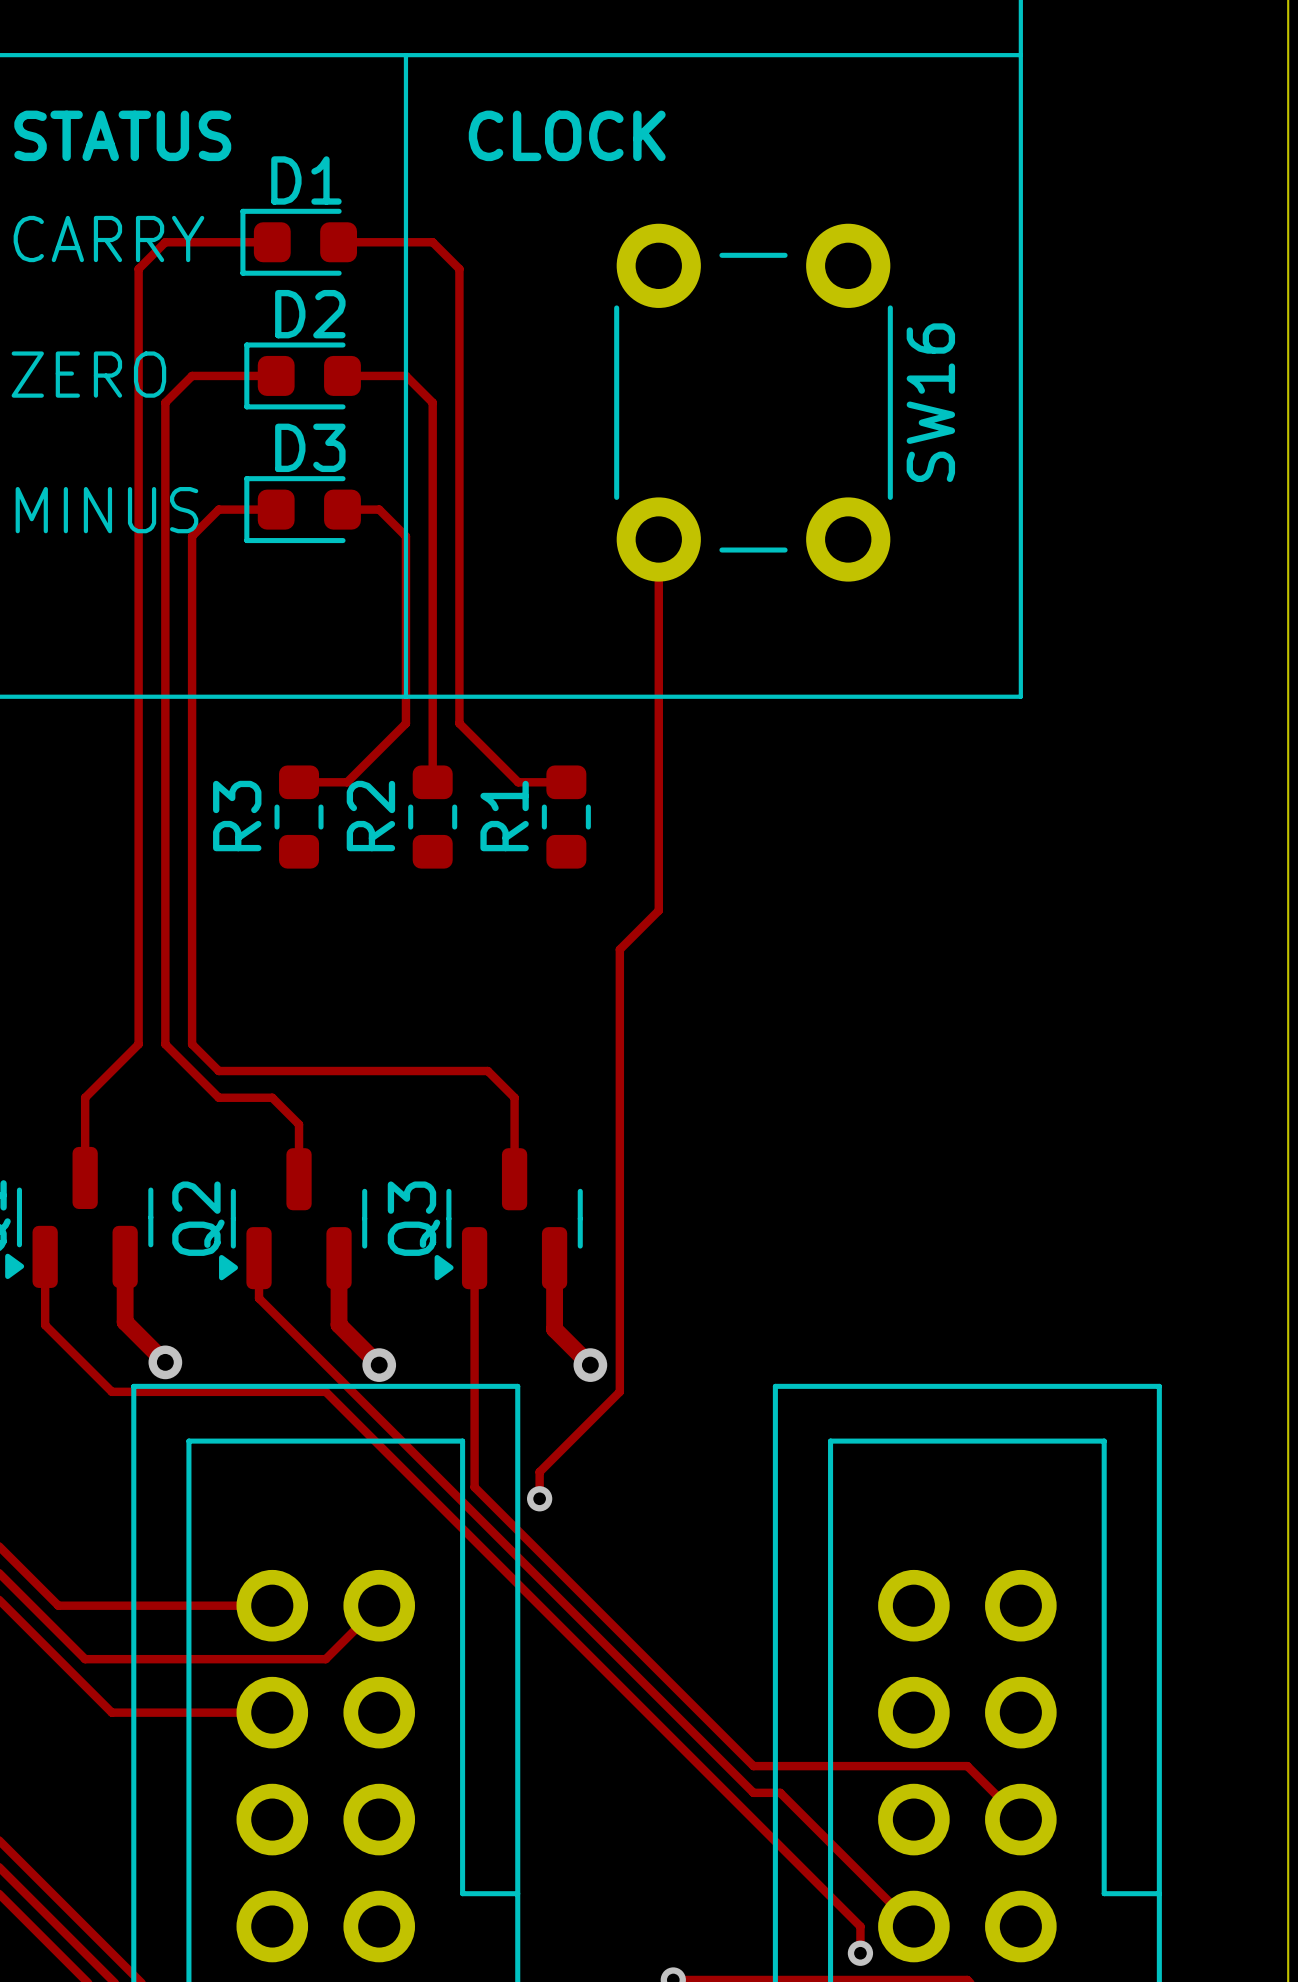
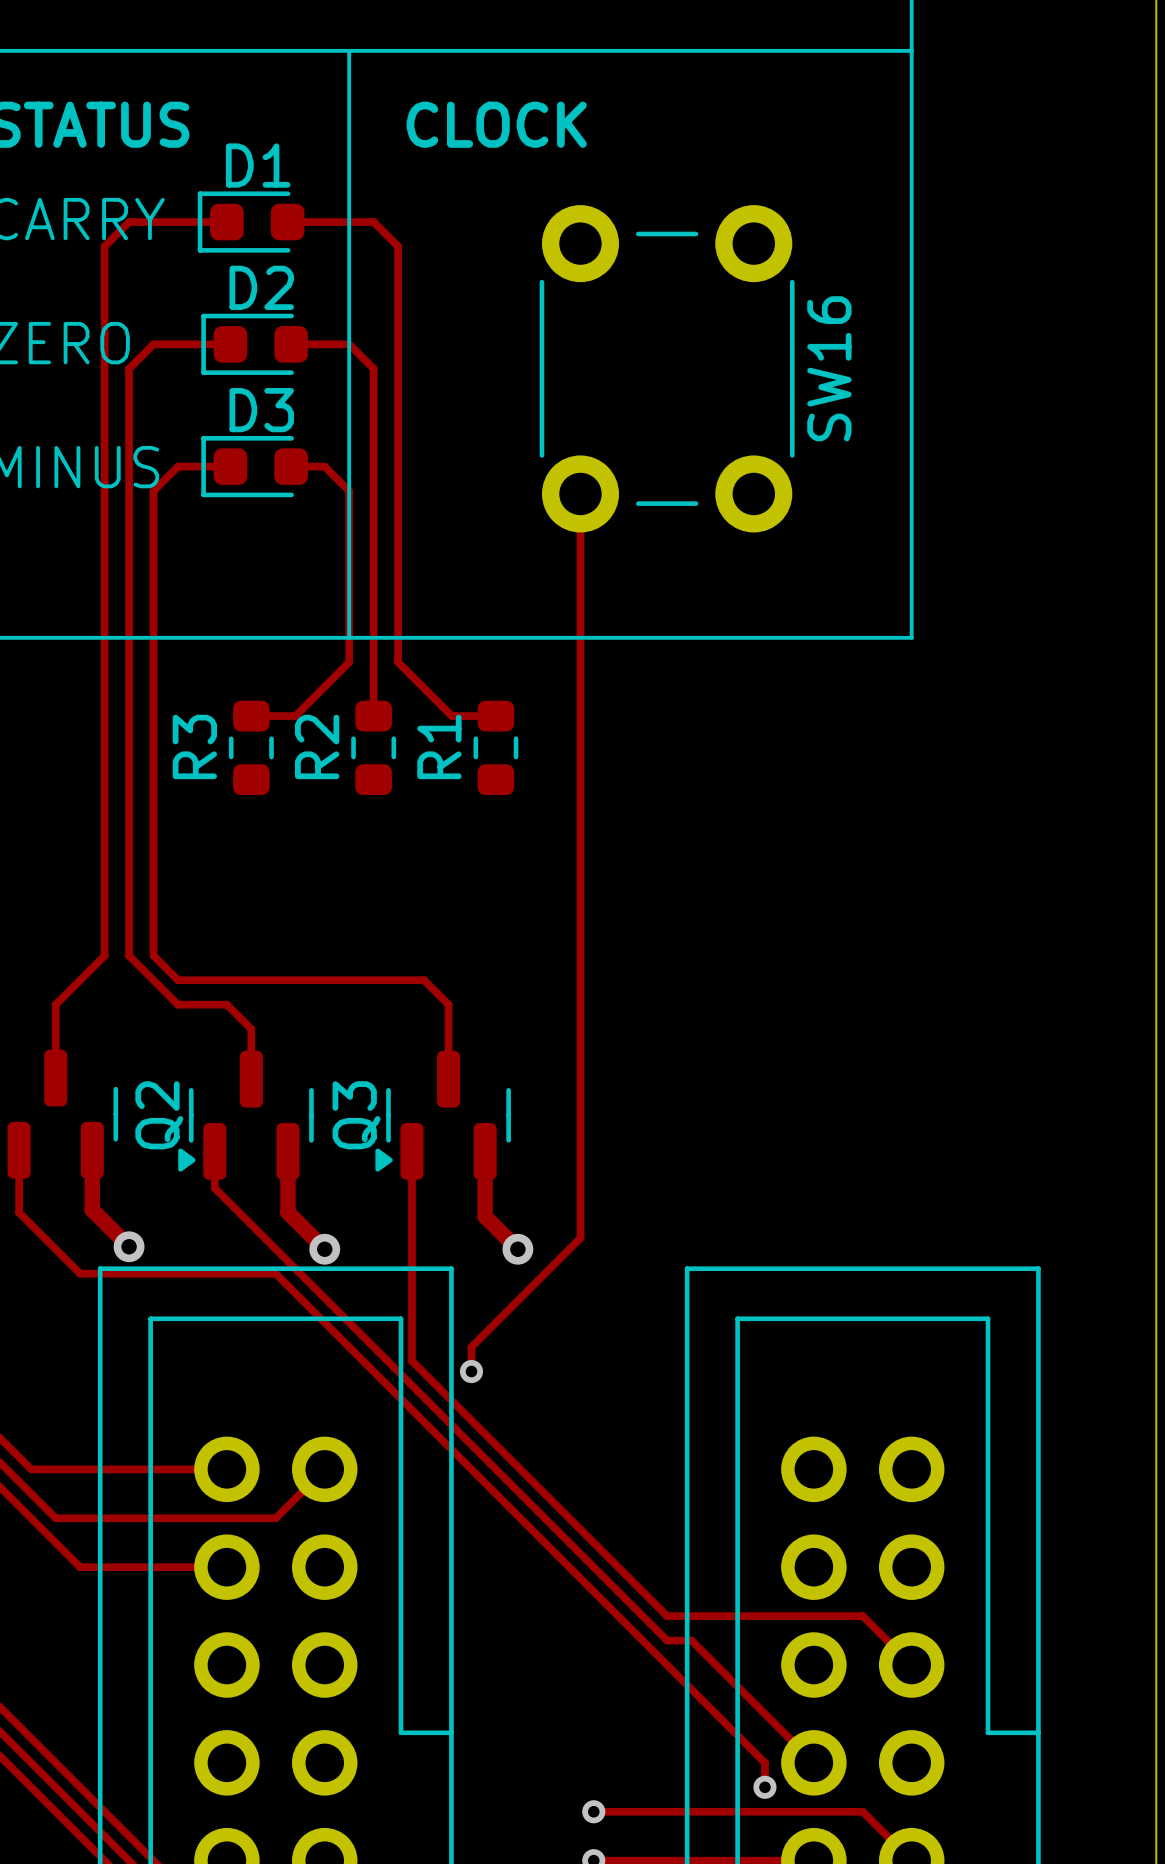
track: (658, 910) (619, 949) (619, 1391) -> (580, 833) (580, 1238) (544, 1273)

